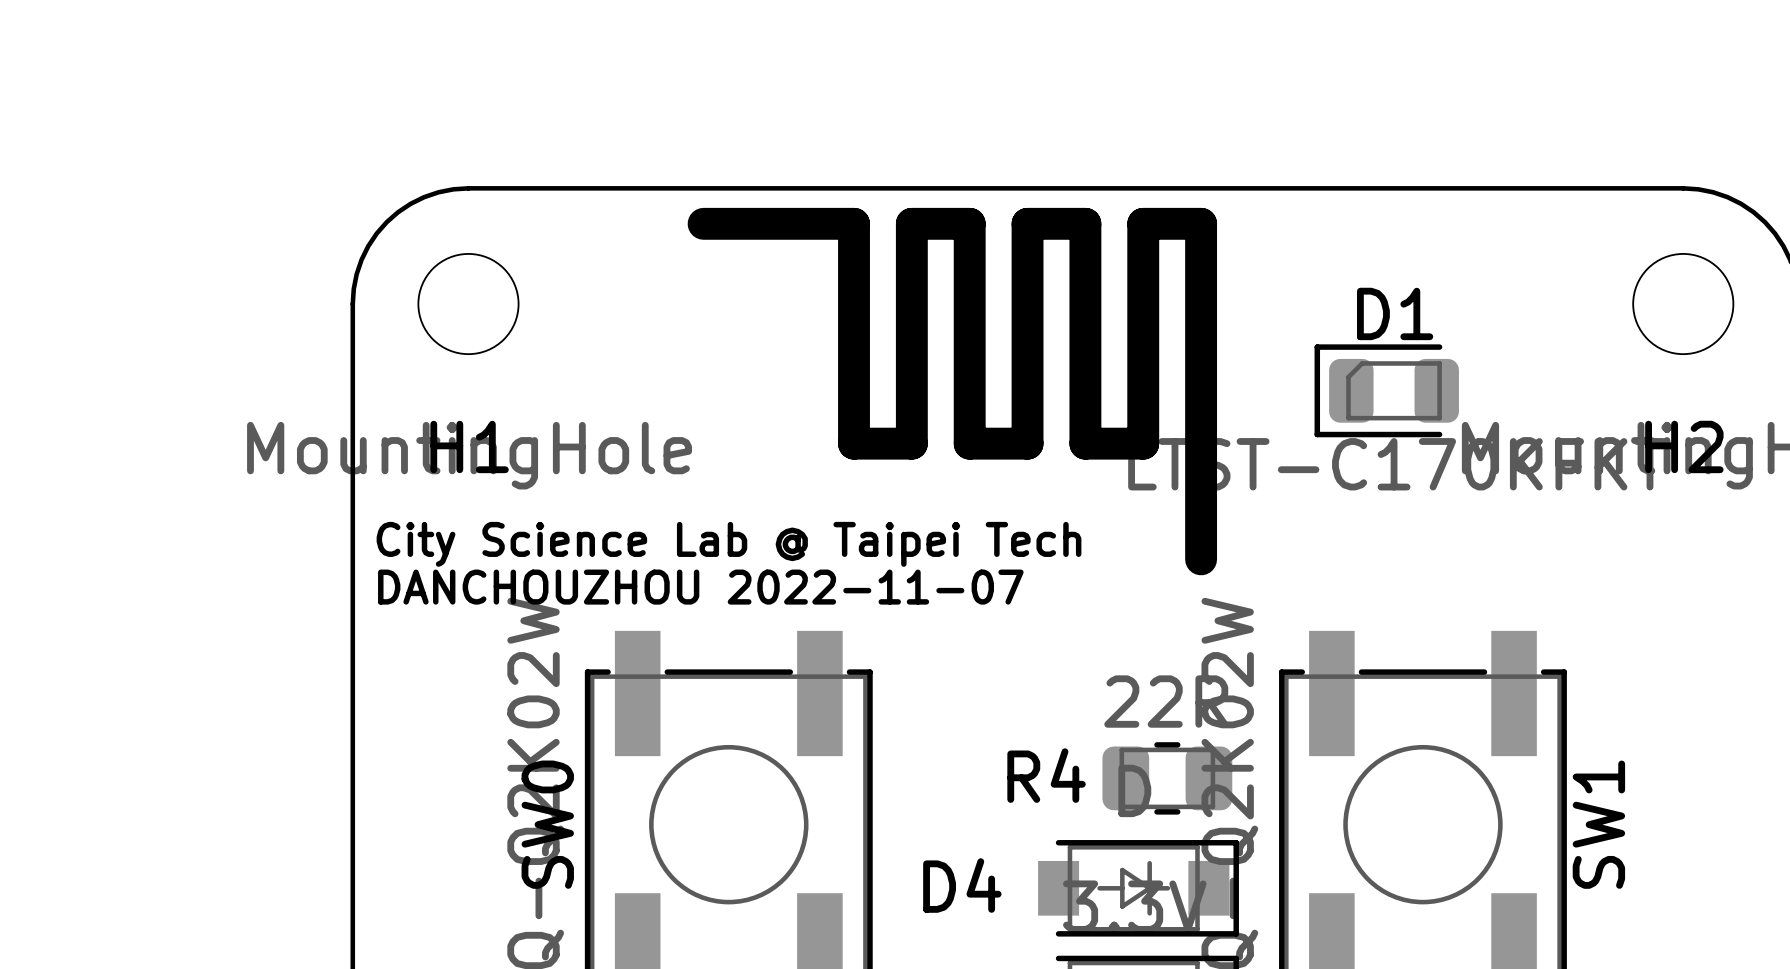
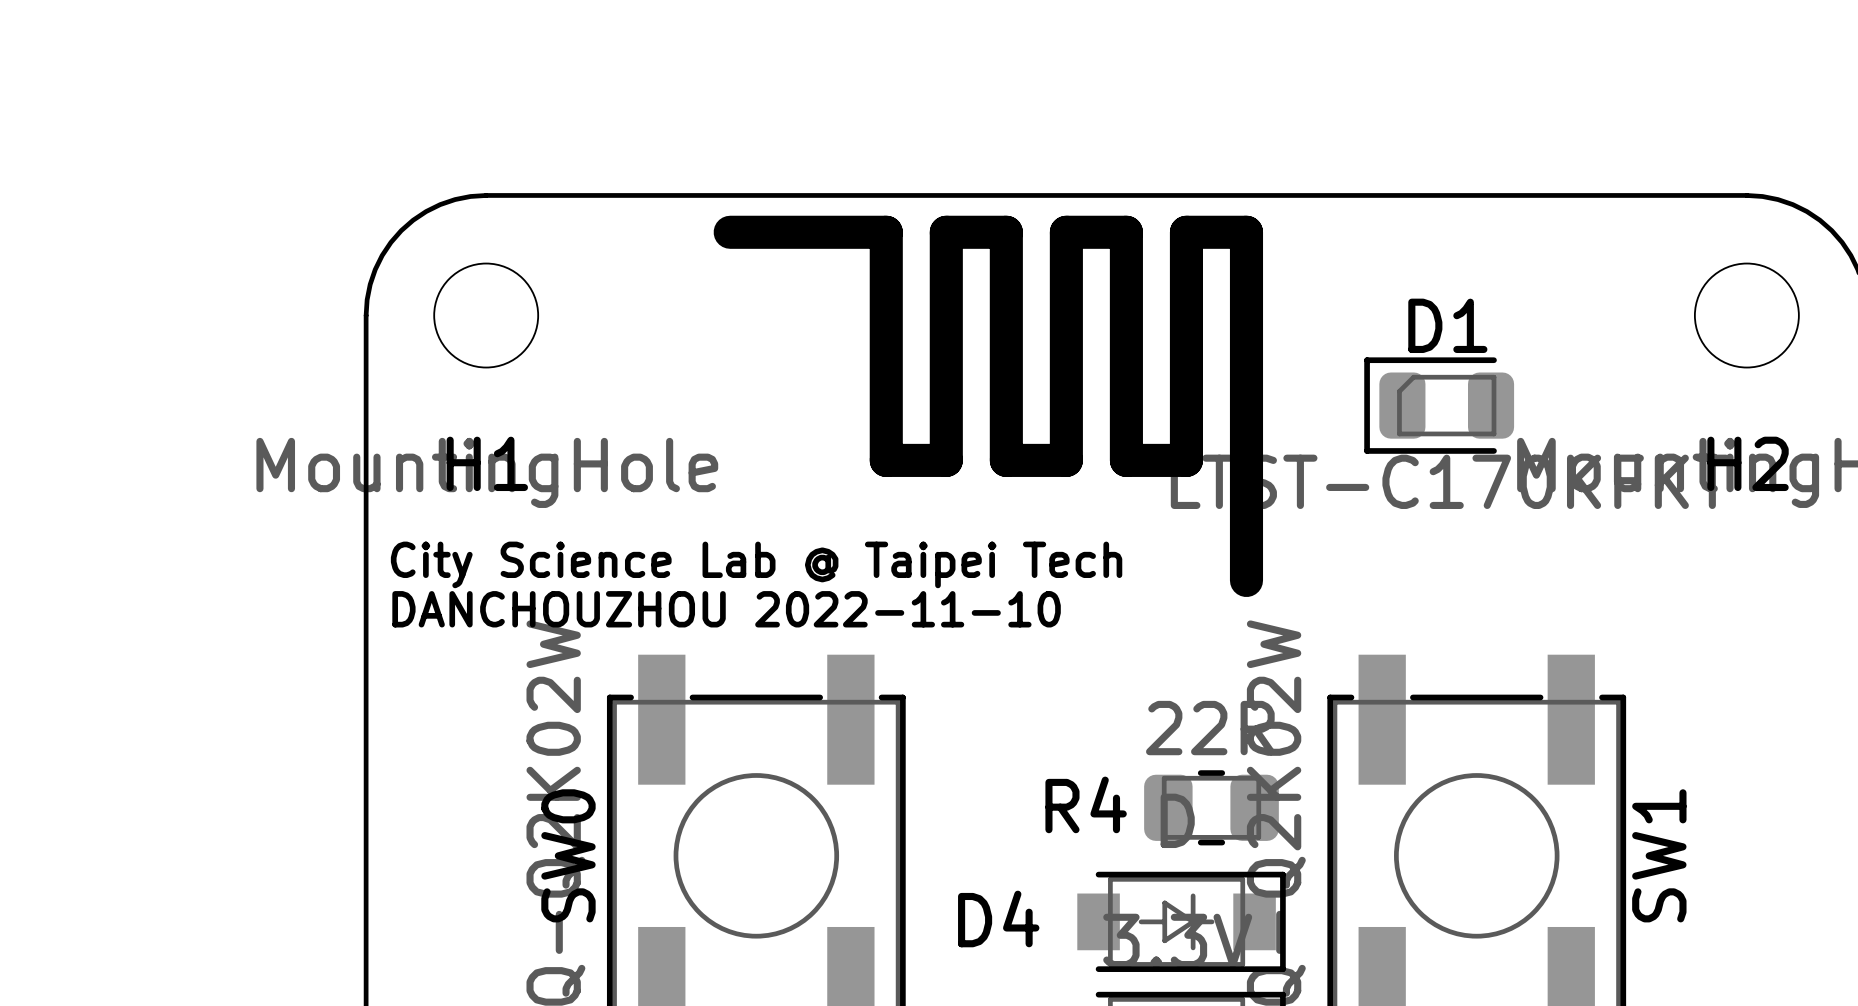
text: DANCHOUZHOU 2022-11-07 (700, 587) -> DANCHOUZHOU 2022-11-10 (726, 609)

